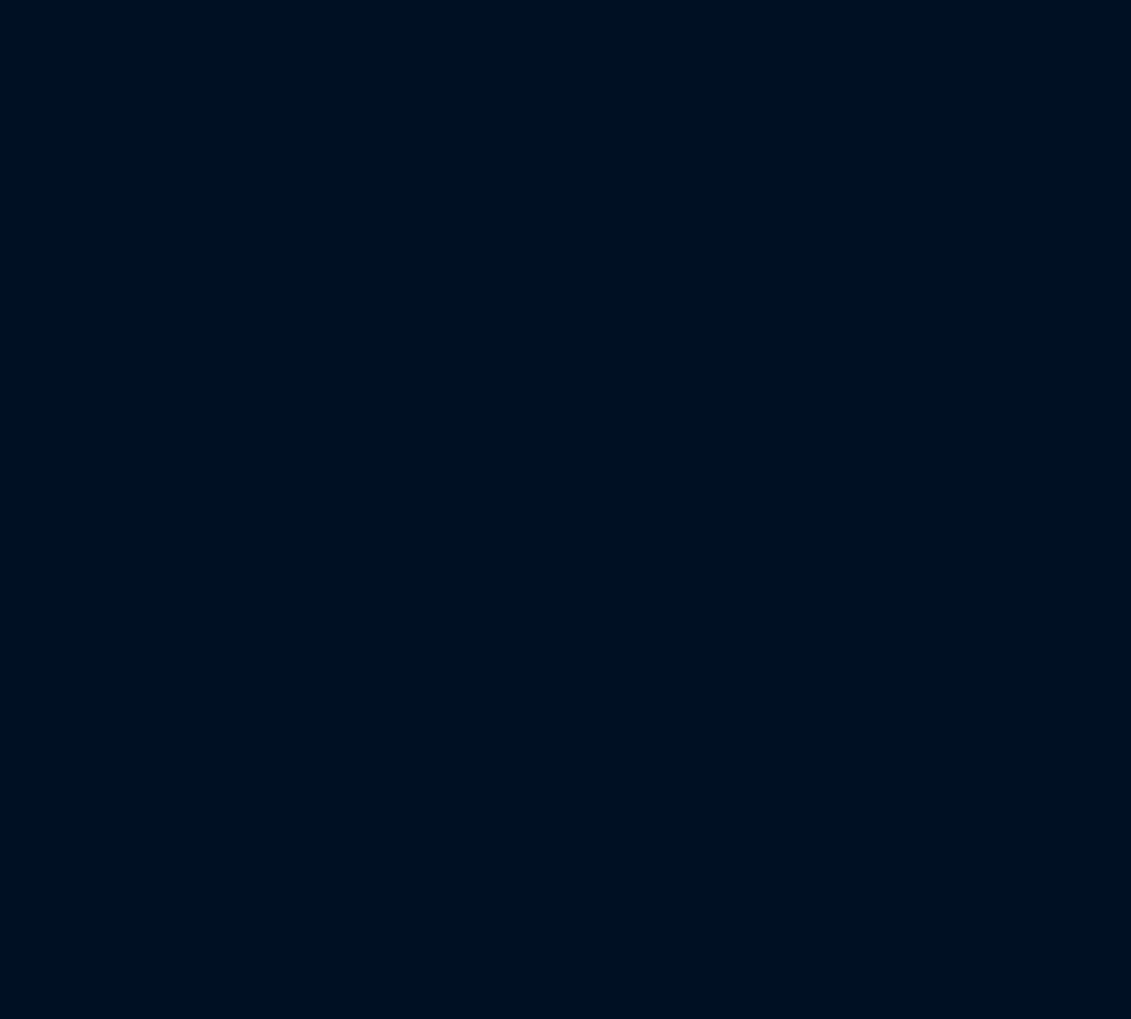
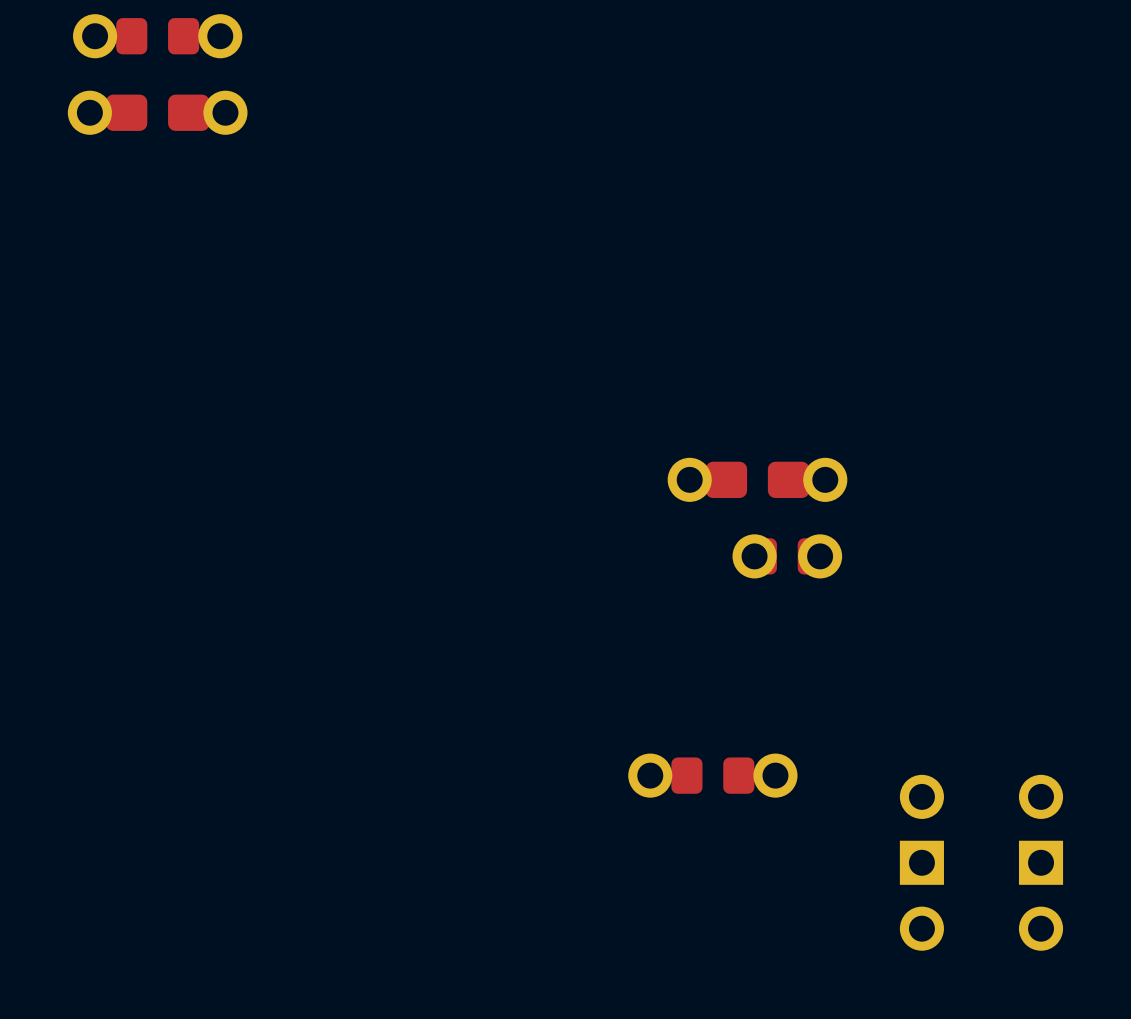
part: none -> (157, 36)
part: none -> (157, 112)
part: none -> (757, 479)
part: none -> (787, 556)
part: none -> (712, 775)
part: none -> (921, 862)
part: none -> (1041, 862)

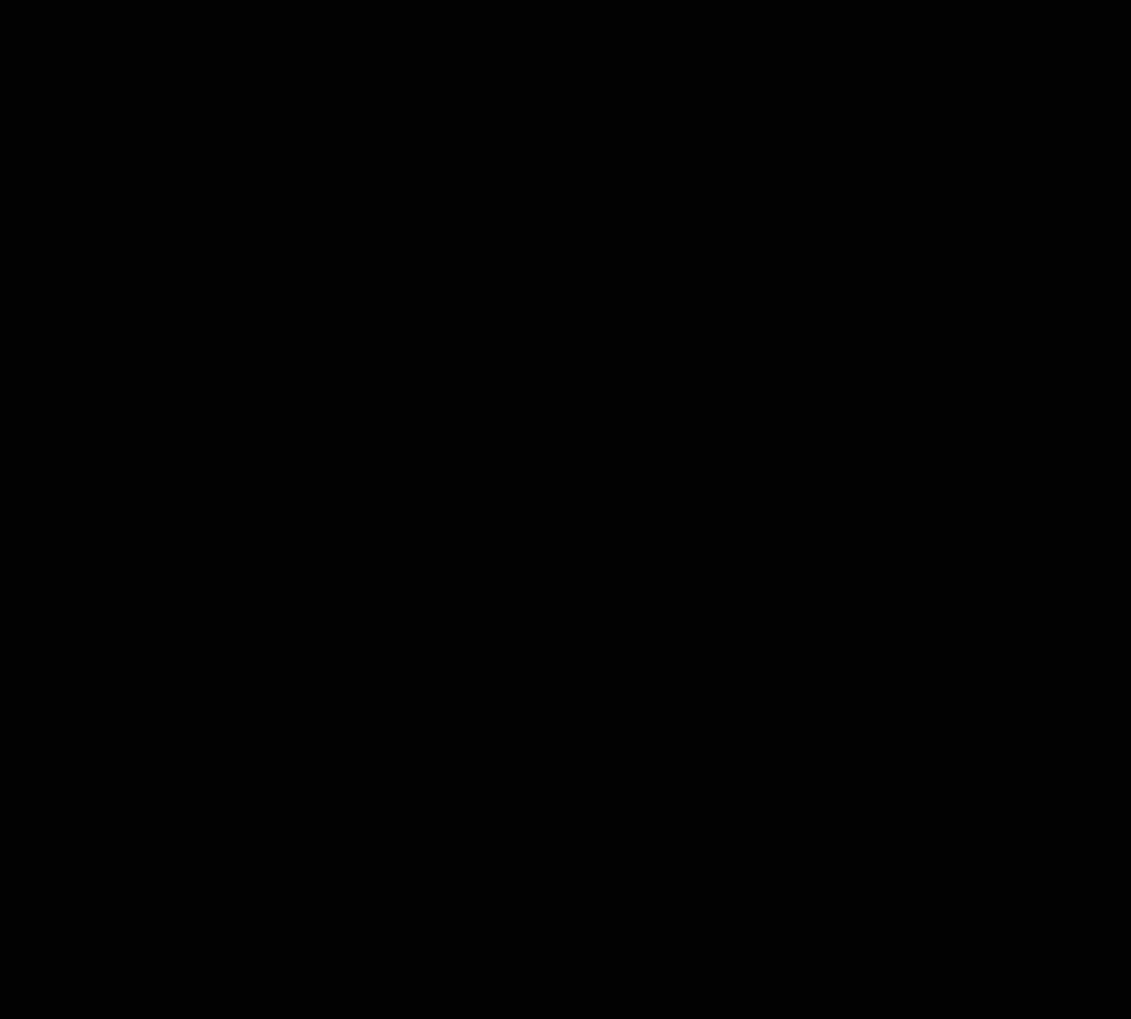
part: (157, 36) -> none
part: (157, 112) -> none
part: (757, 479) -> none
part: (787, 556) -> none
part: (712, 775) -> none
part: (921, 862) -> none
part: (1041, 862) -> none

